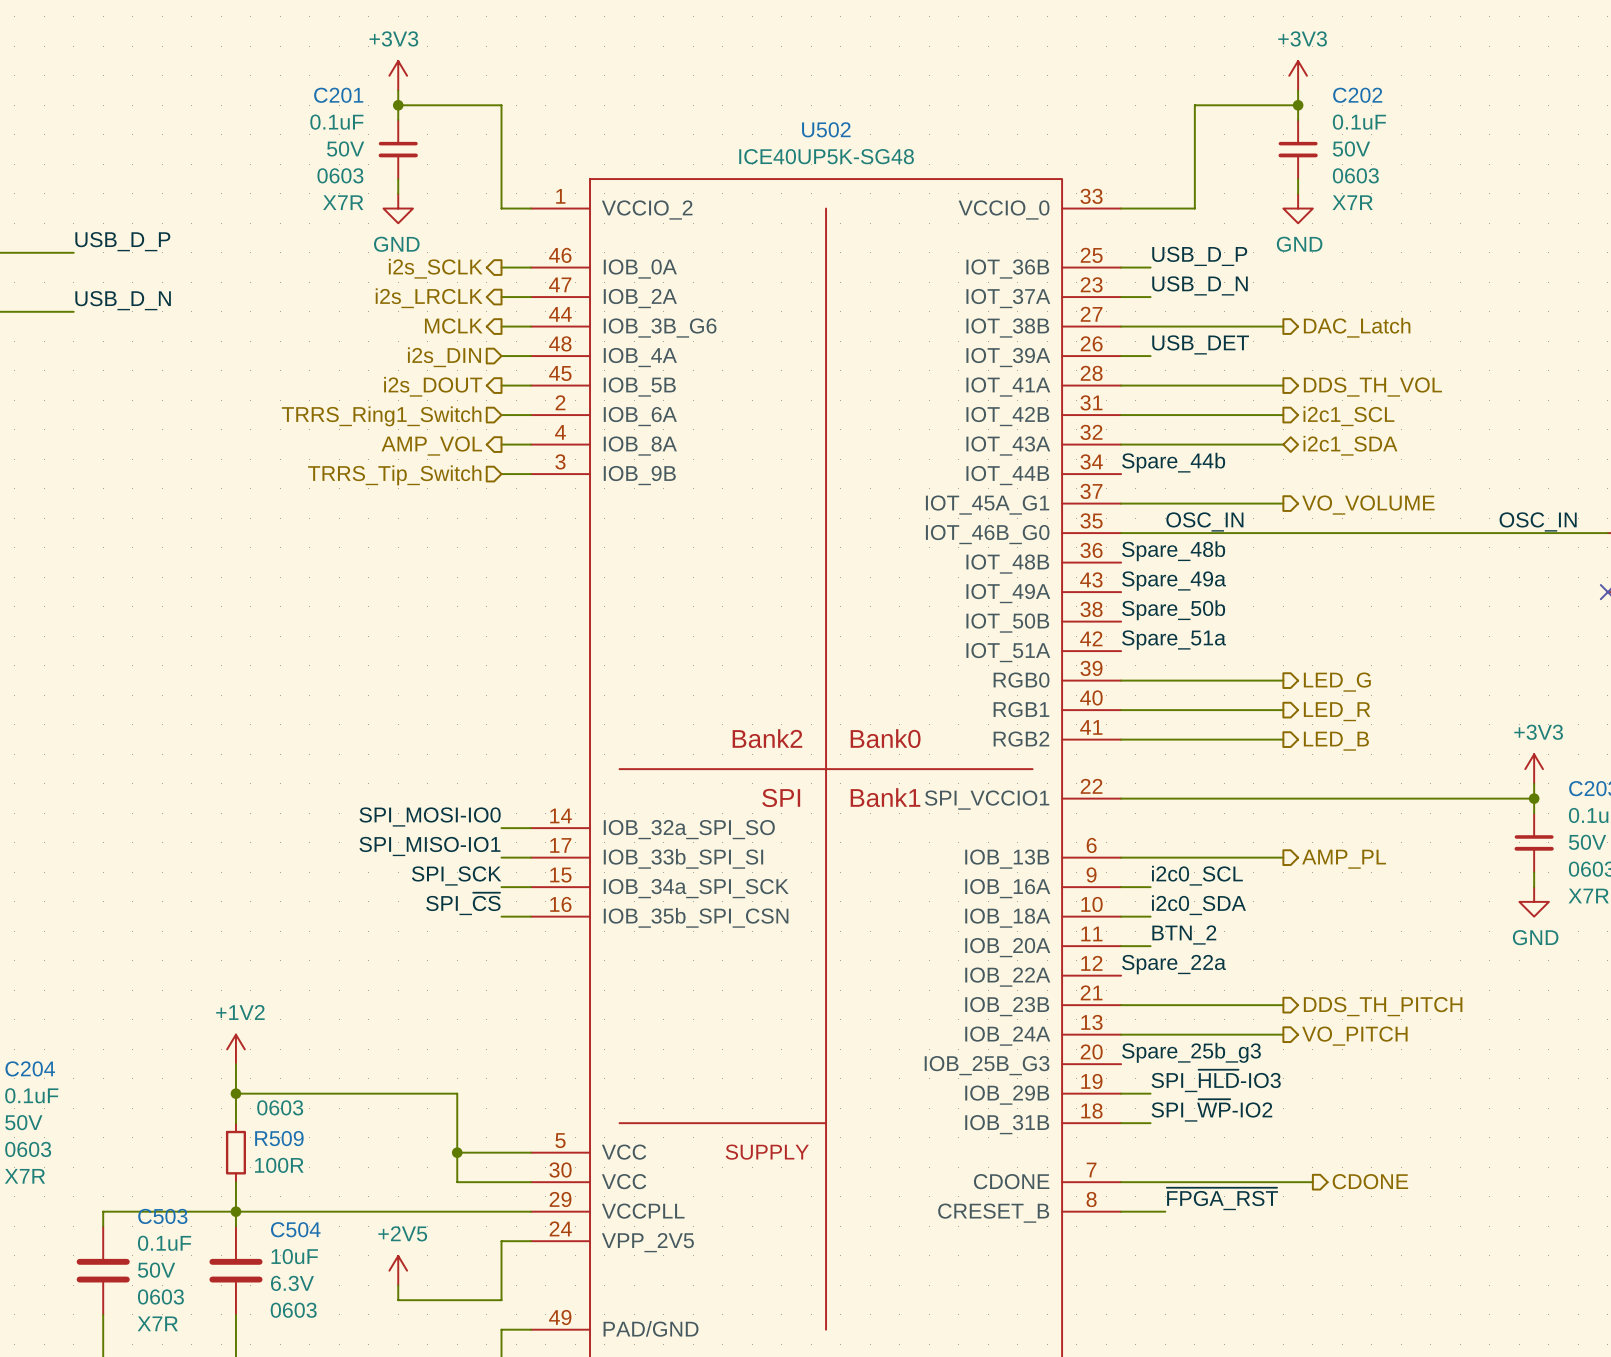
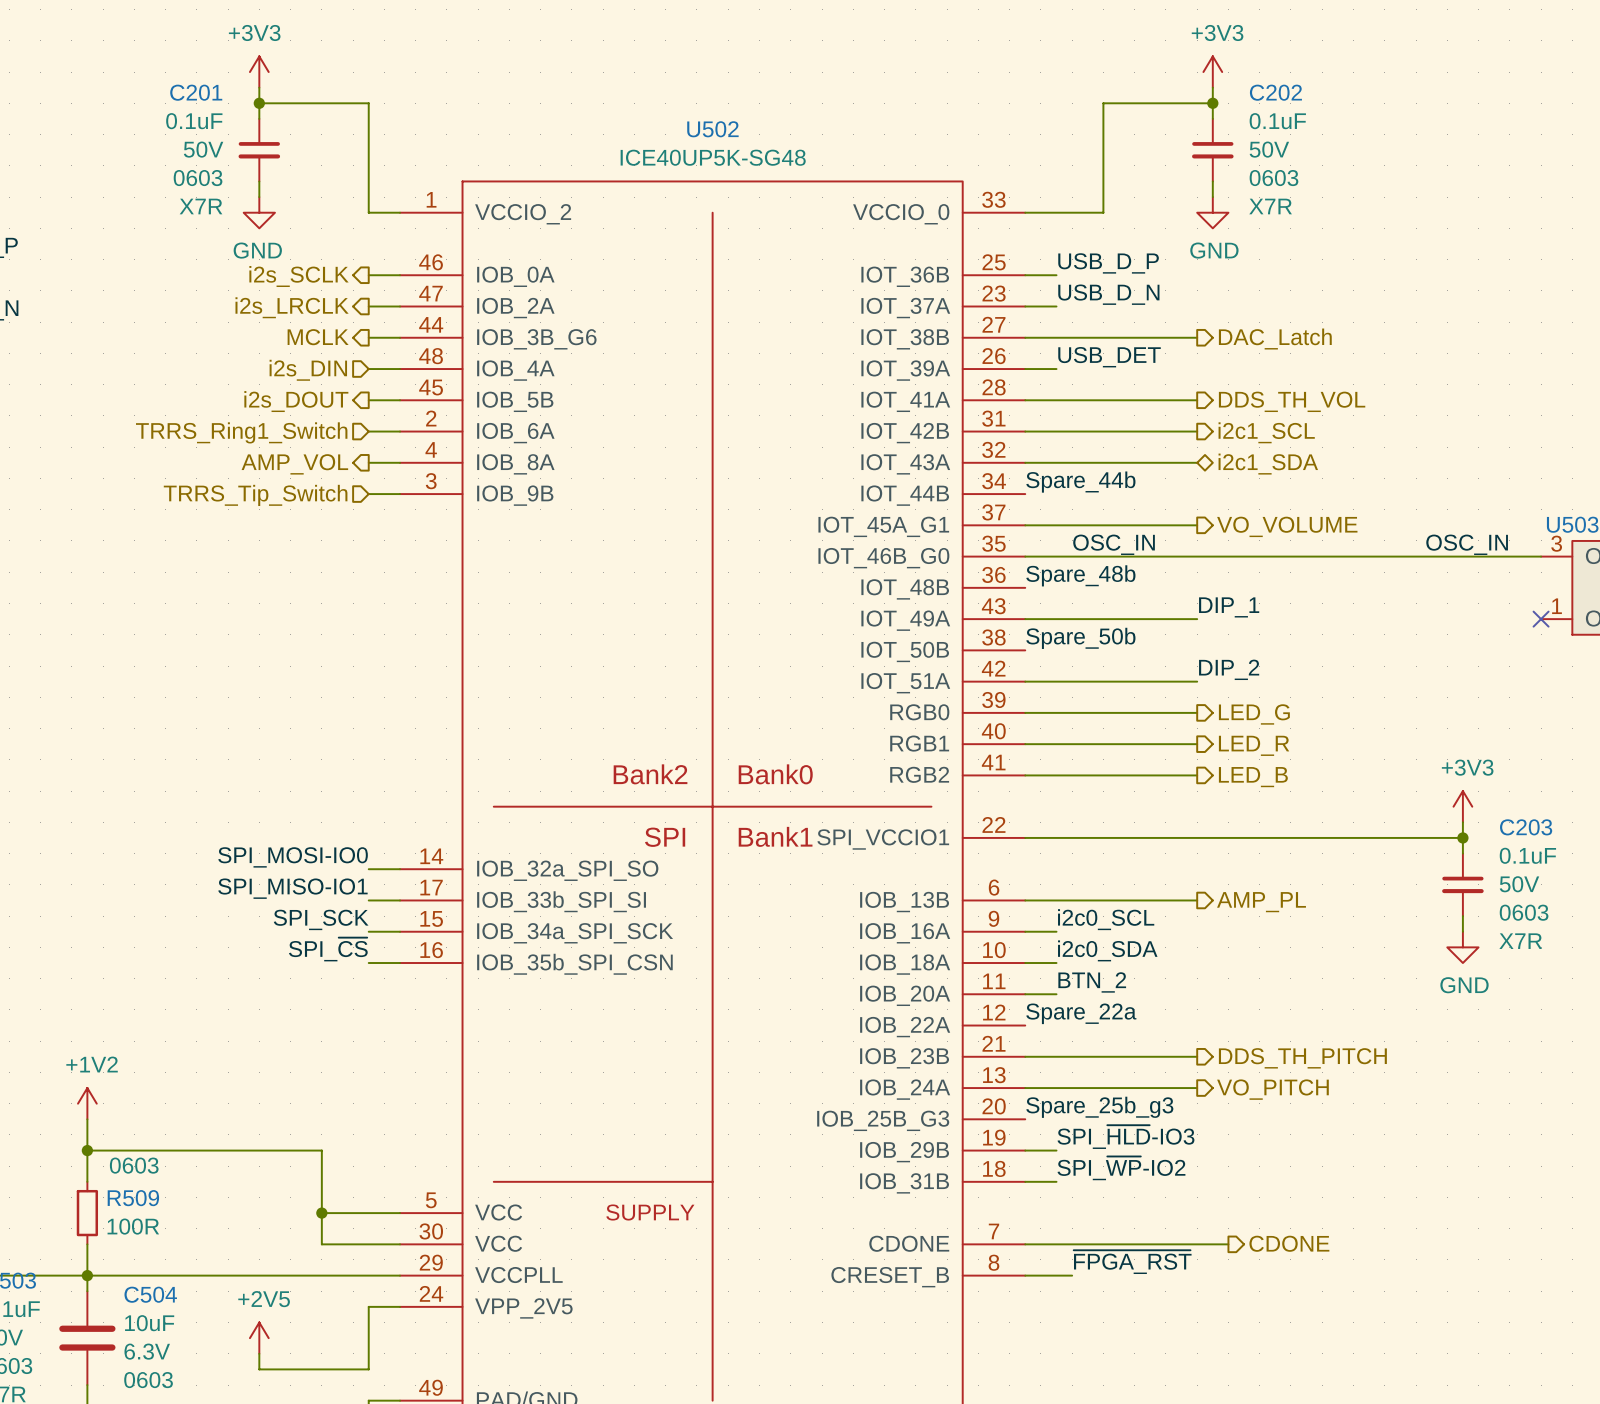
label: Spare_49a (1174, 581) -> none
label: none -> DIP_1 (1229, 607)
wire: none -> (1025, 619) (1197, 619)
label: none -> DIP_2 (1229, 669)
label: Spare_51a (1174, 640) -> none
wire: none -> (1025, 681) (1197, 681)

